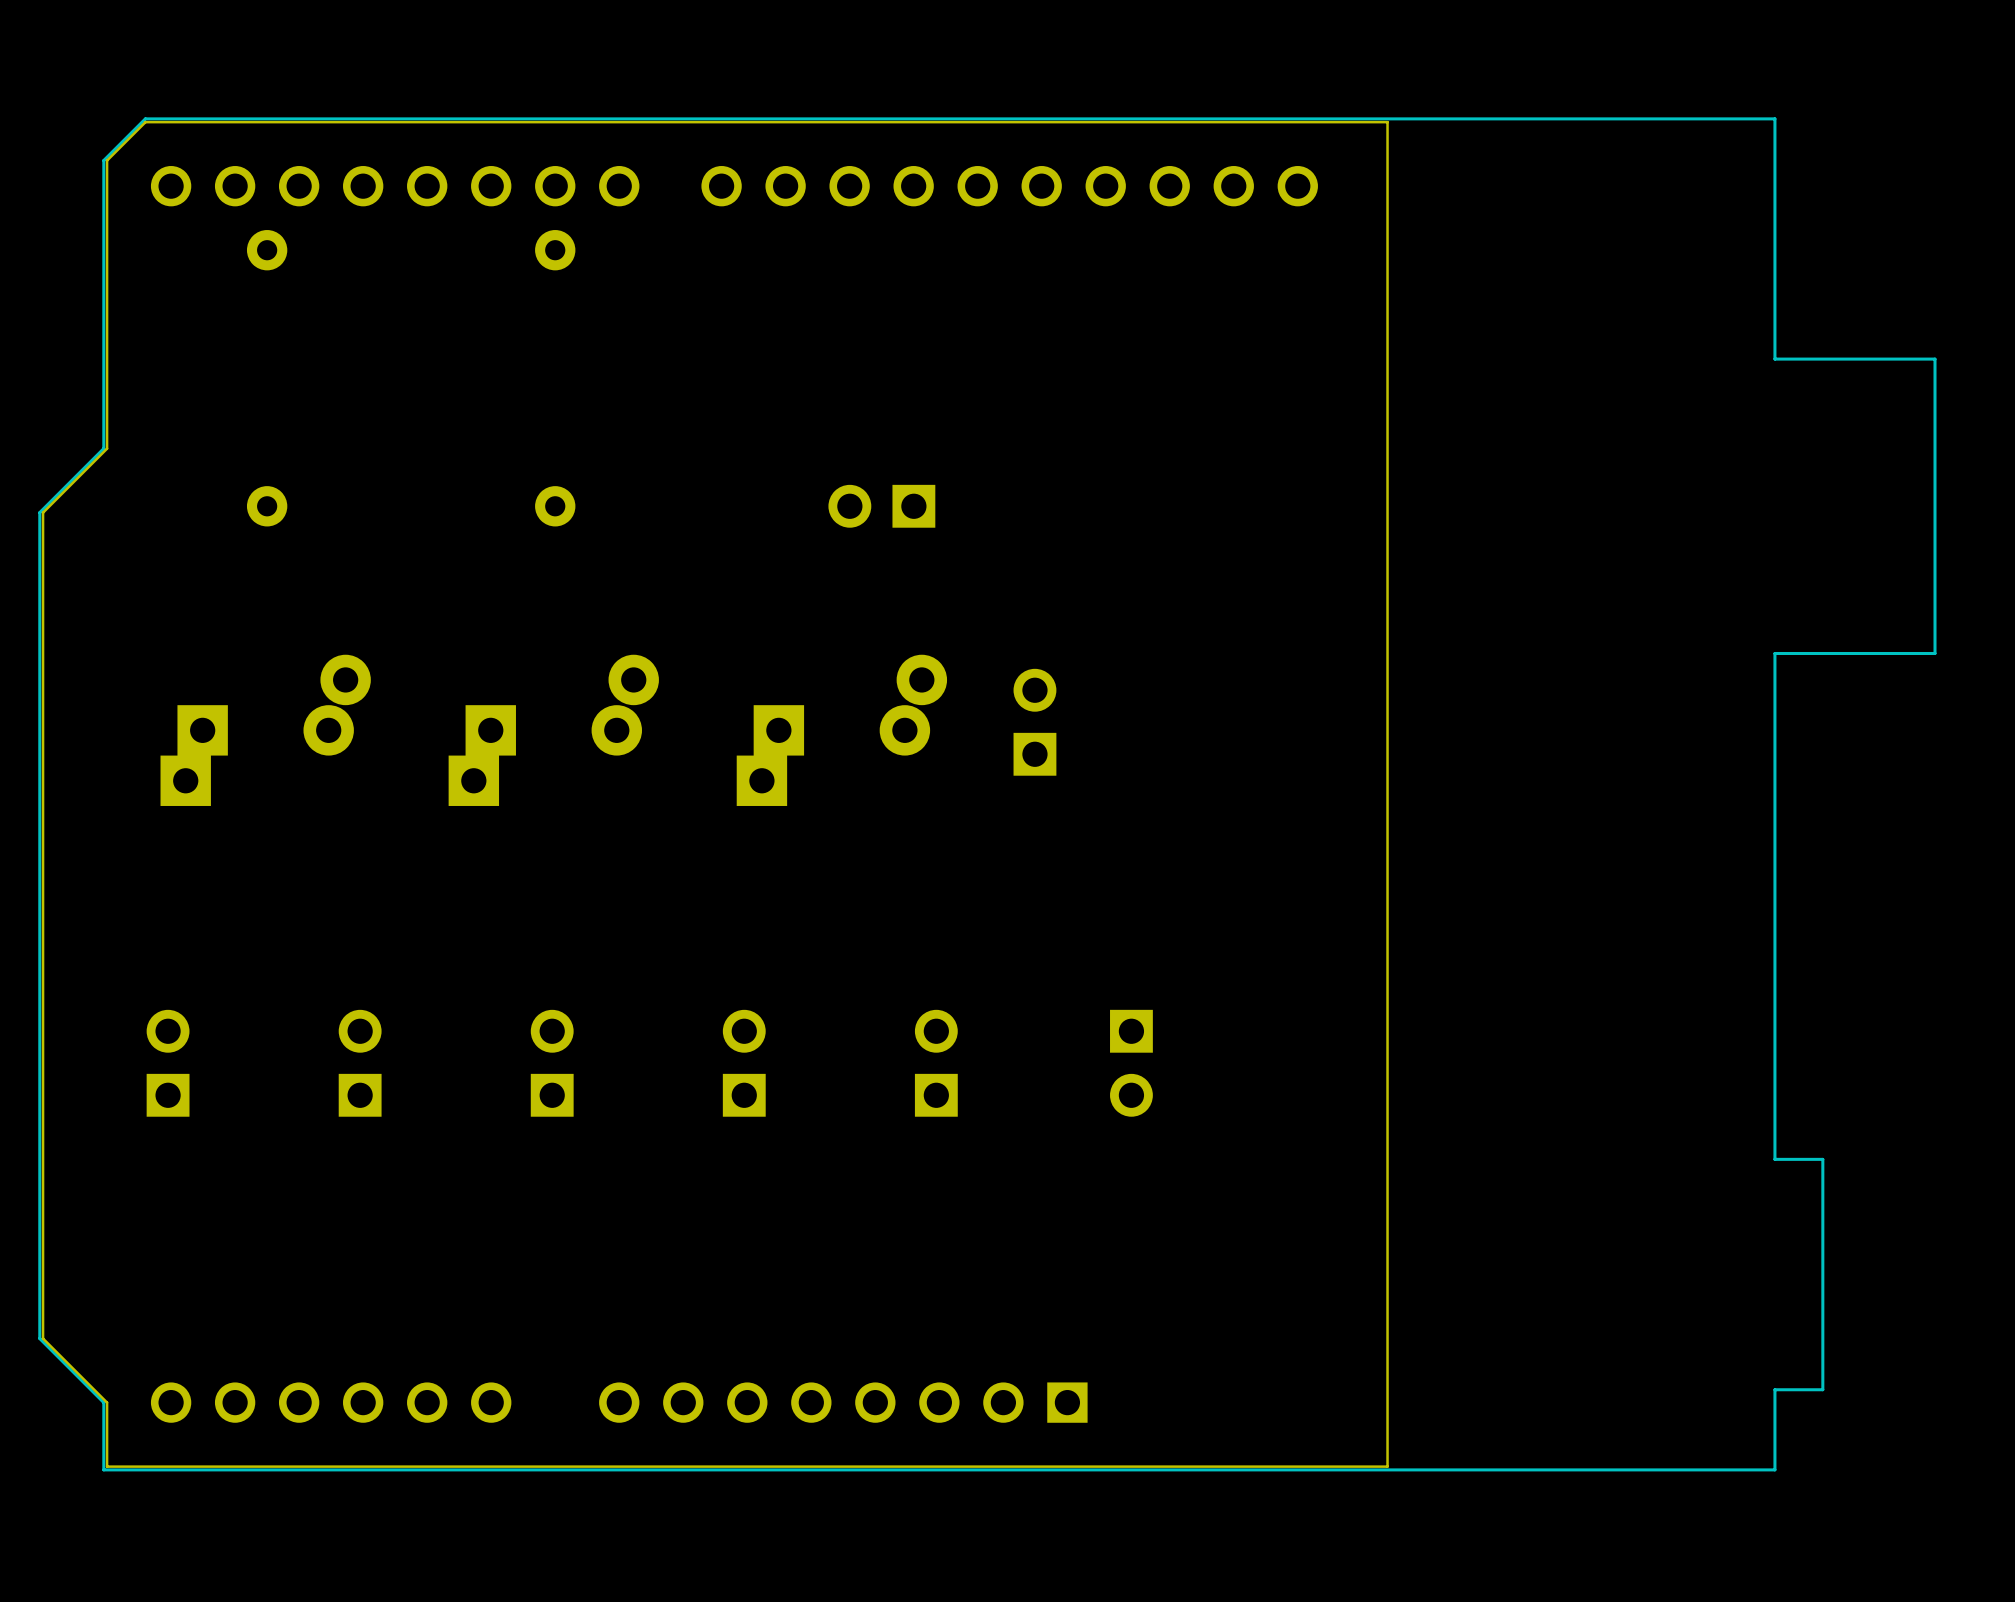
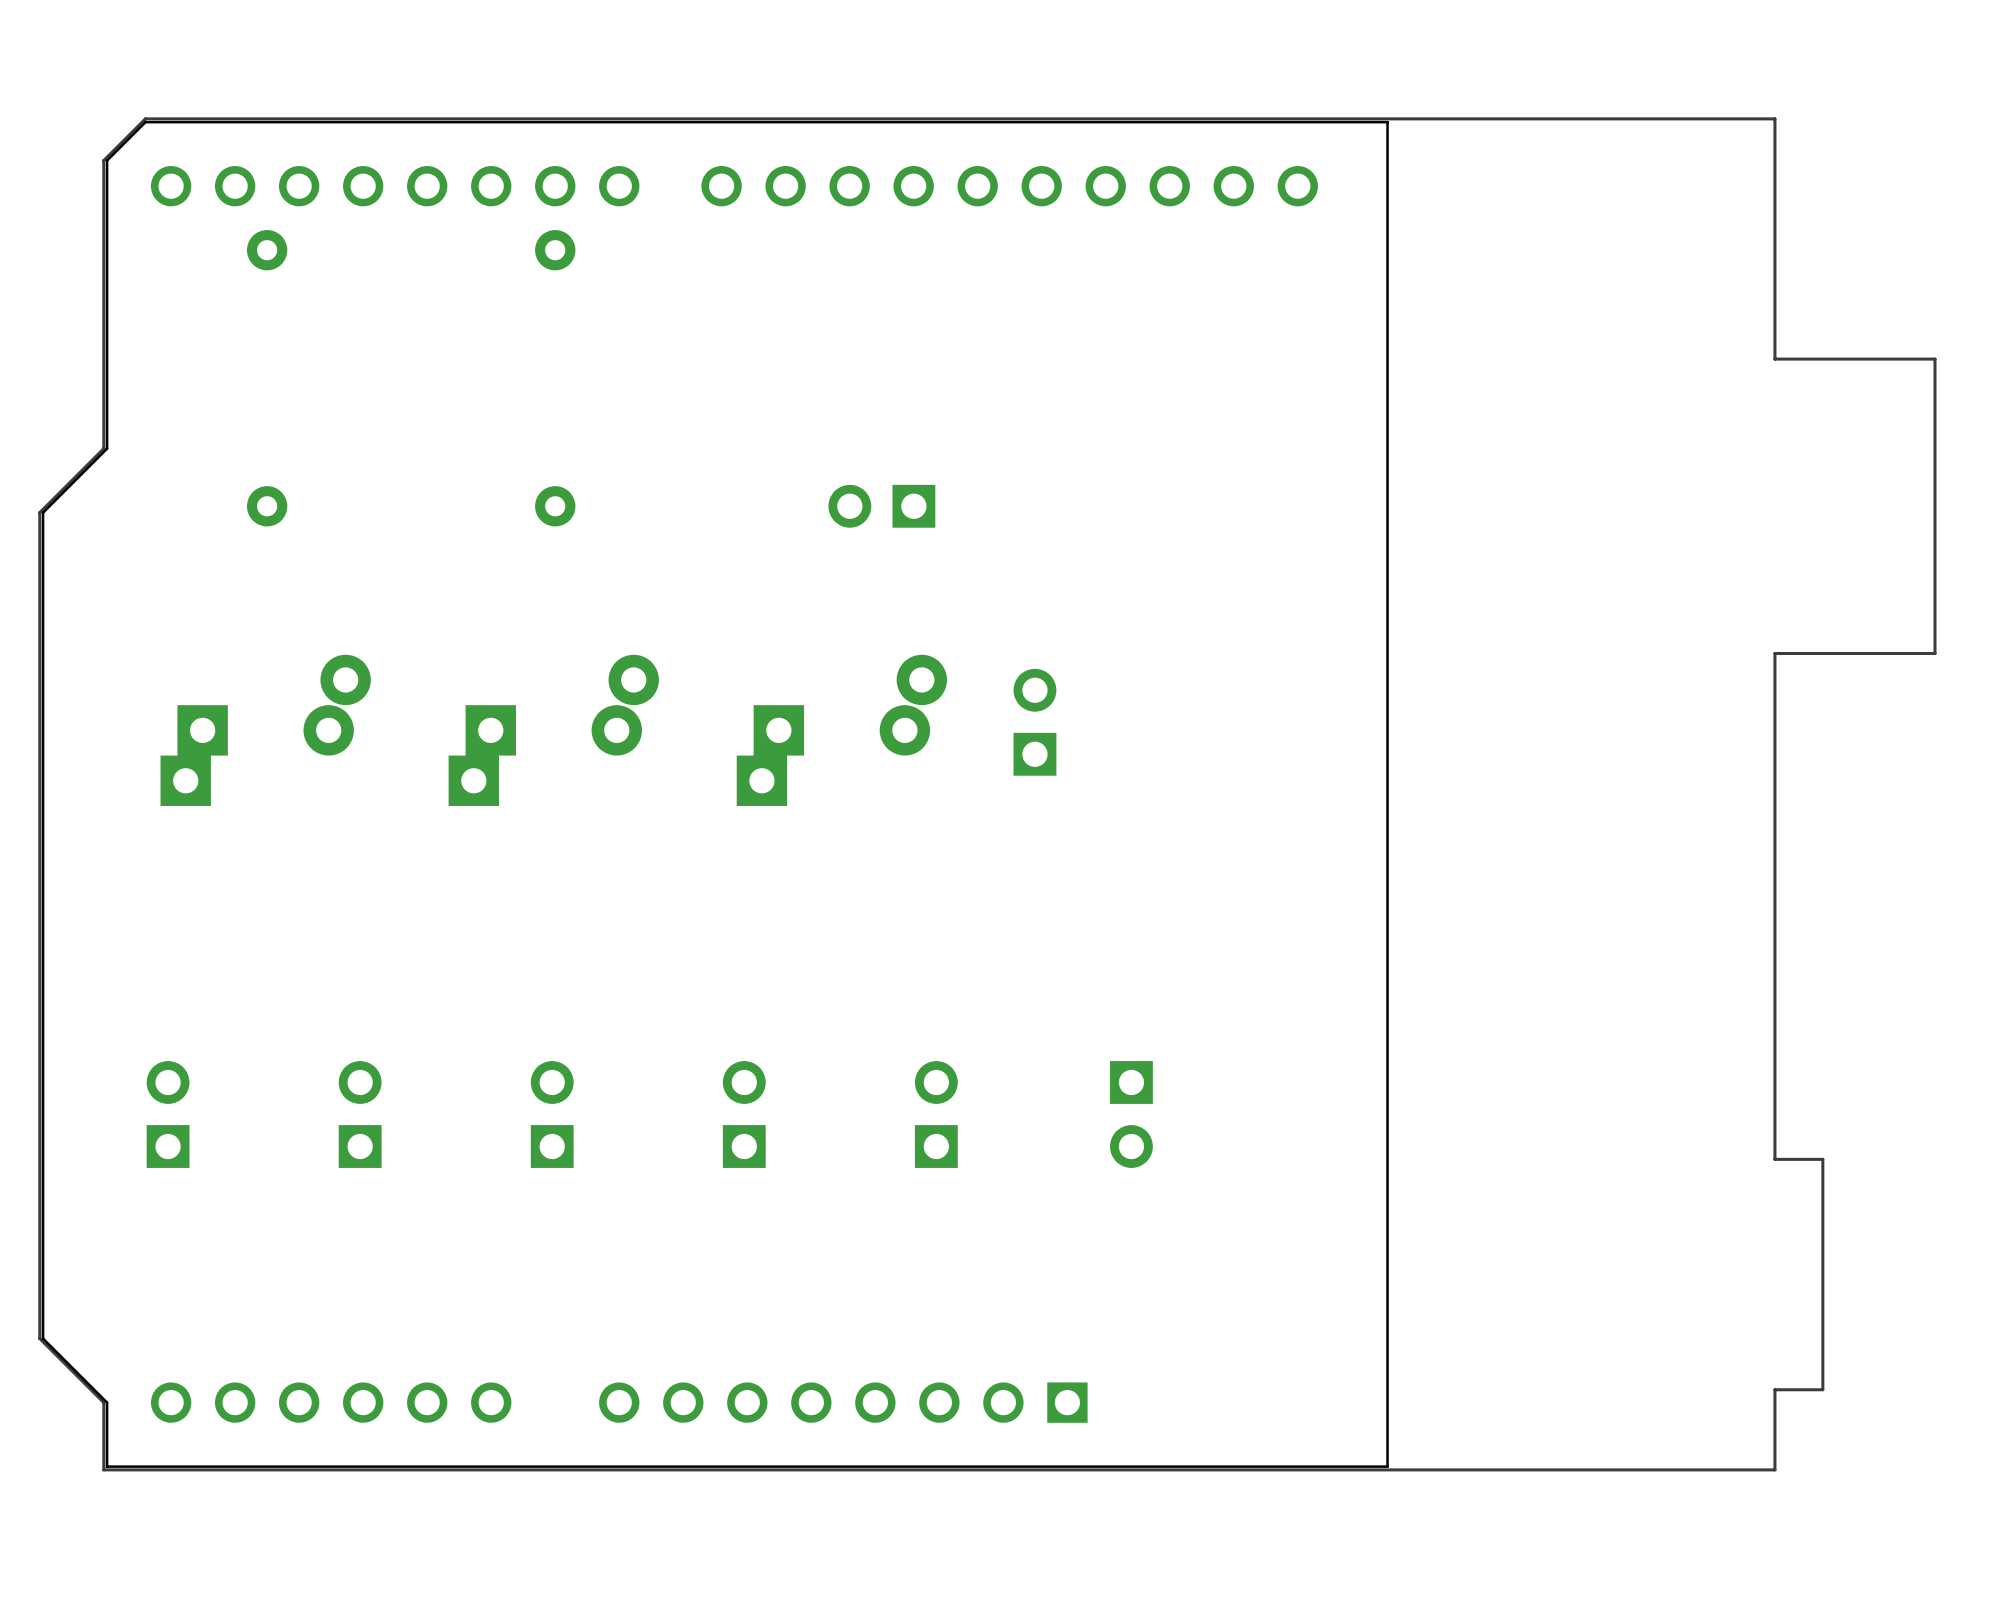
part position: (168, 1063) -> (168, 1114)
part position: (360, 1063) -> (360, 1114)
part position: (552, 1063) -> (552, 1114)
part position: (744, 1063) -> (744, 1114)
part position: (936, 1063) -> (936, 1114)
part position: (1131, 1063) -> (1131, 1114)

